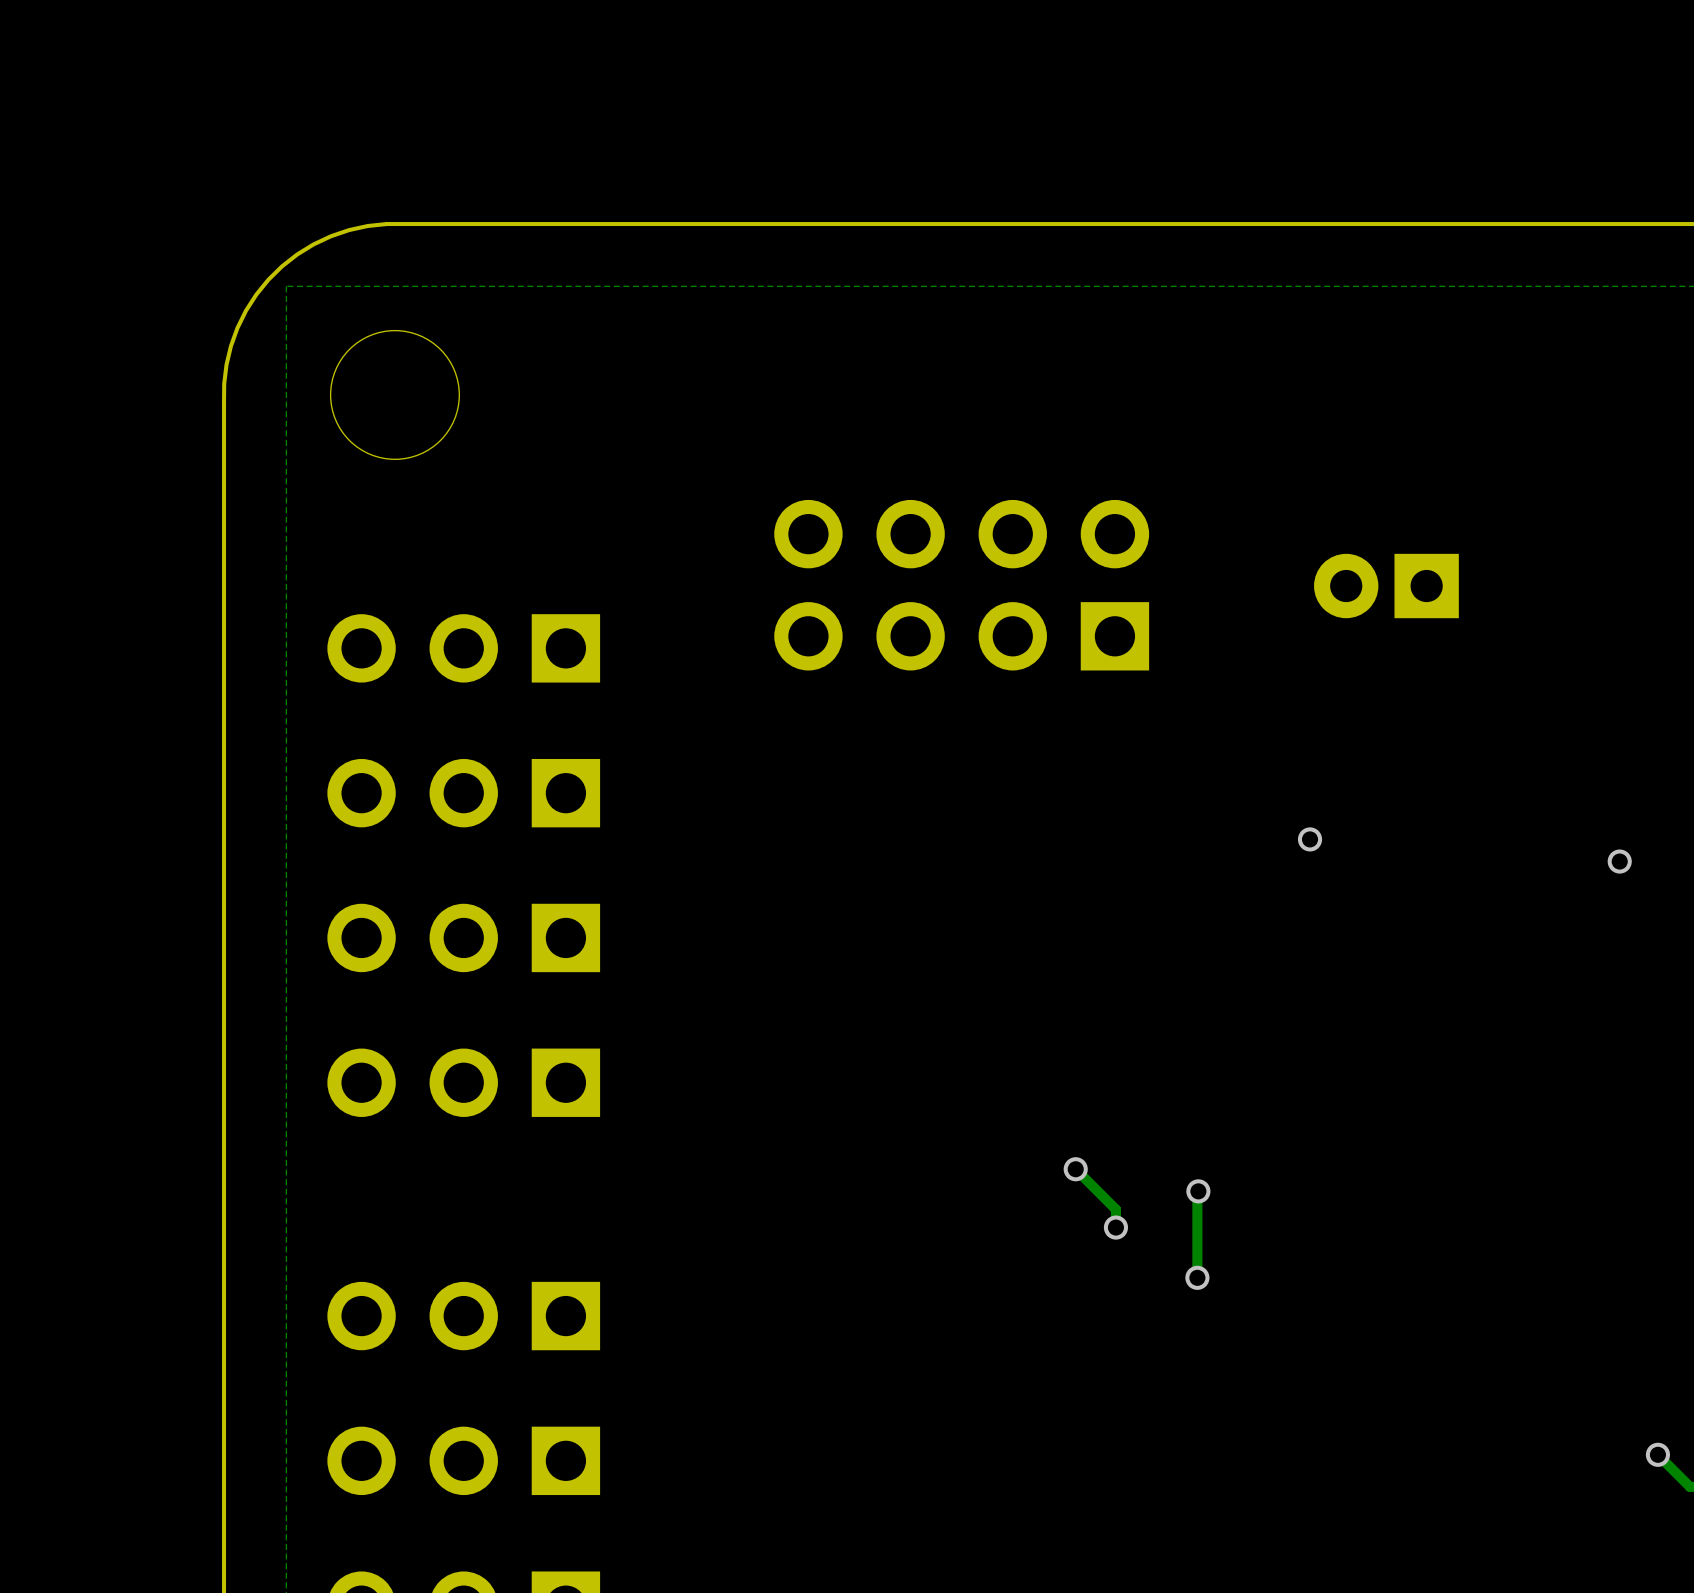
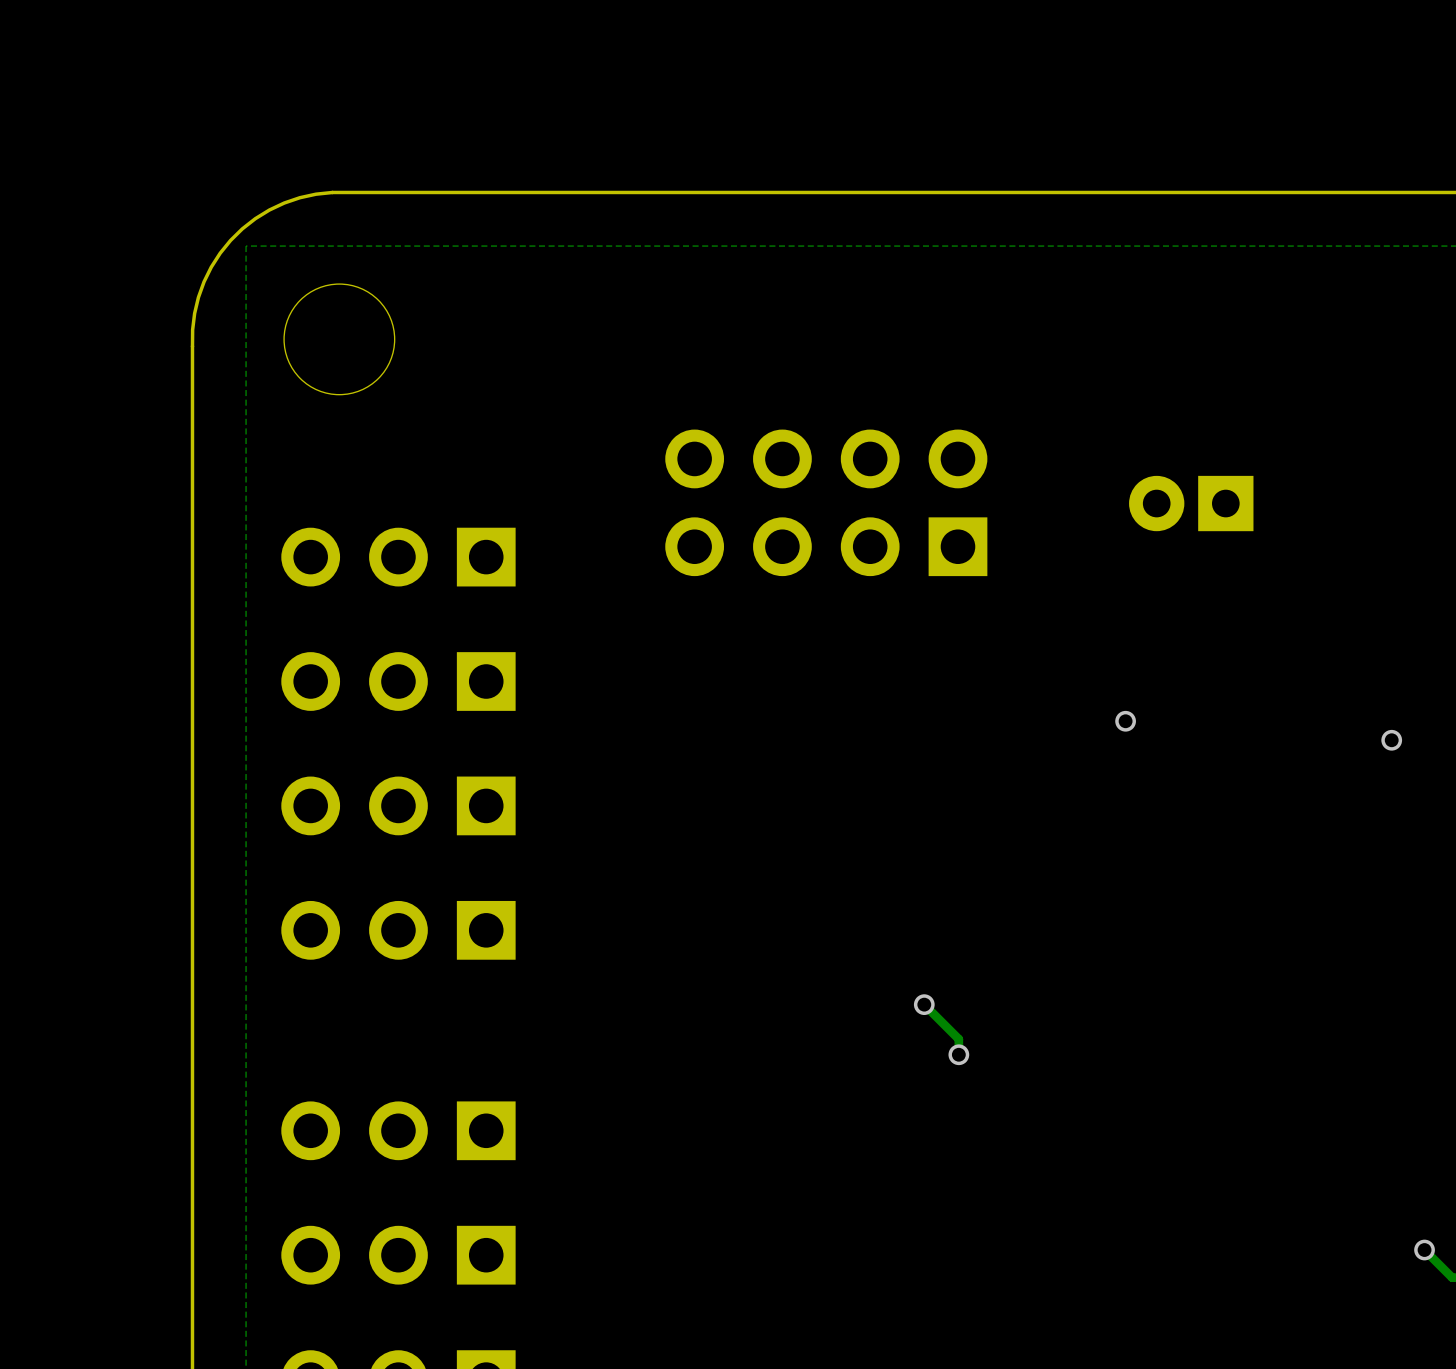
track: (1198, 1191) (1197, 1277) -> none
via: (1198, 1191) -> none
via: (1197, 1277) -> none

